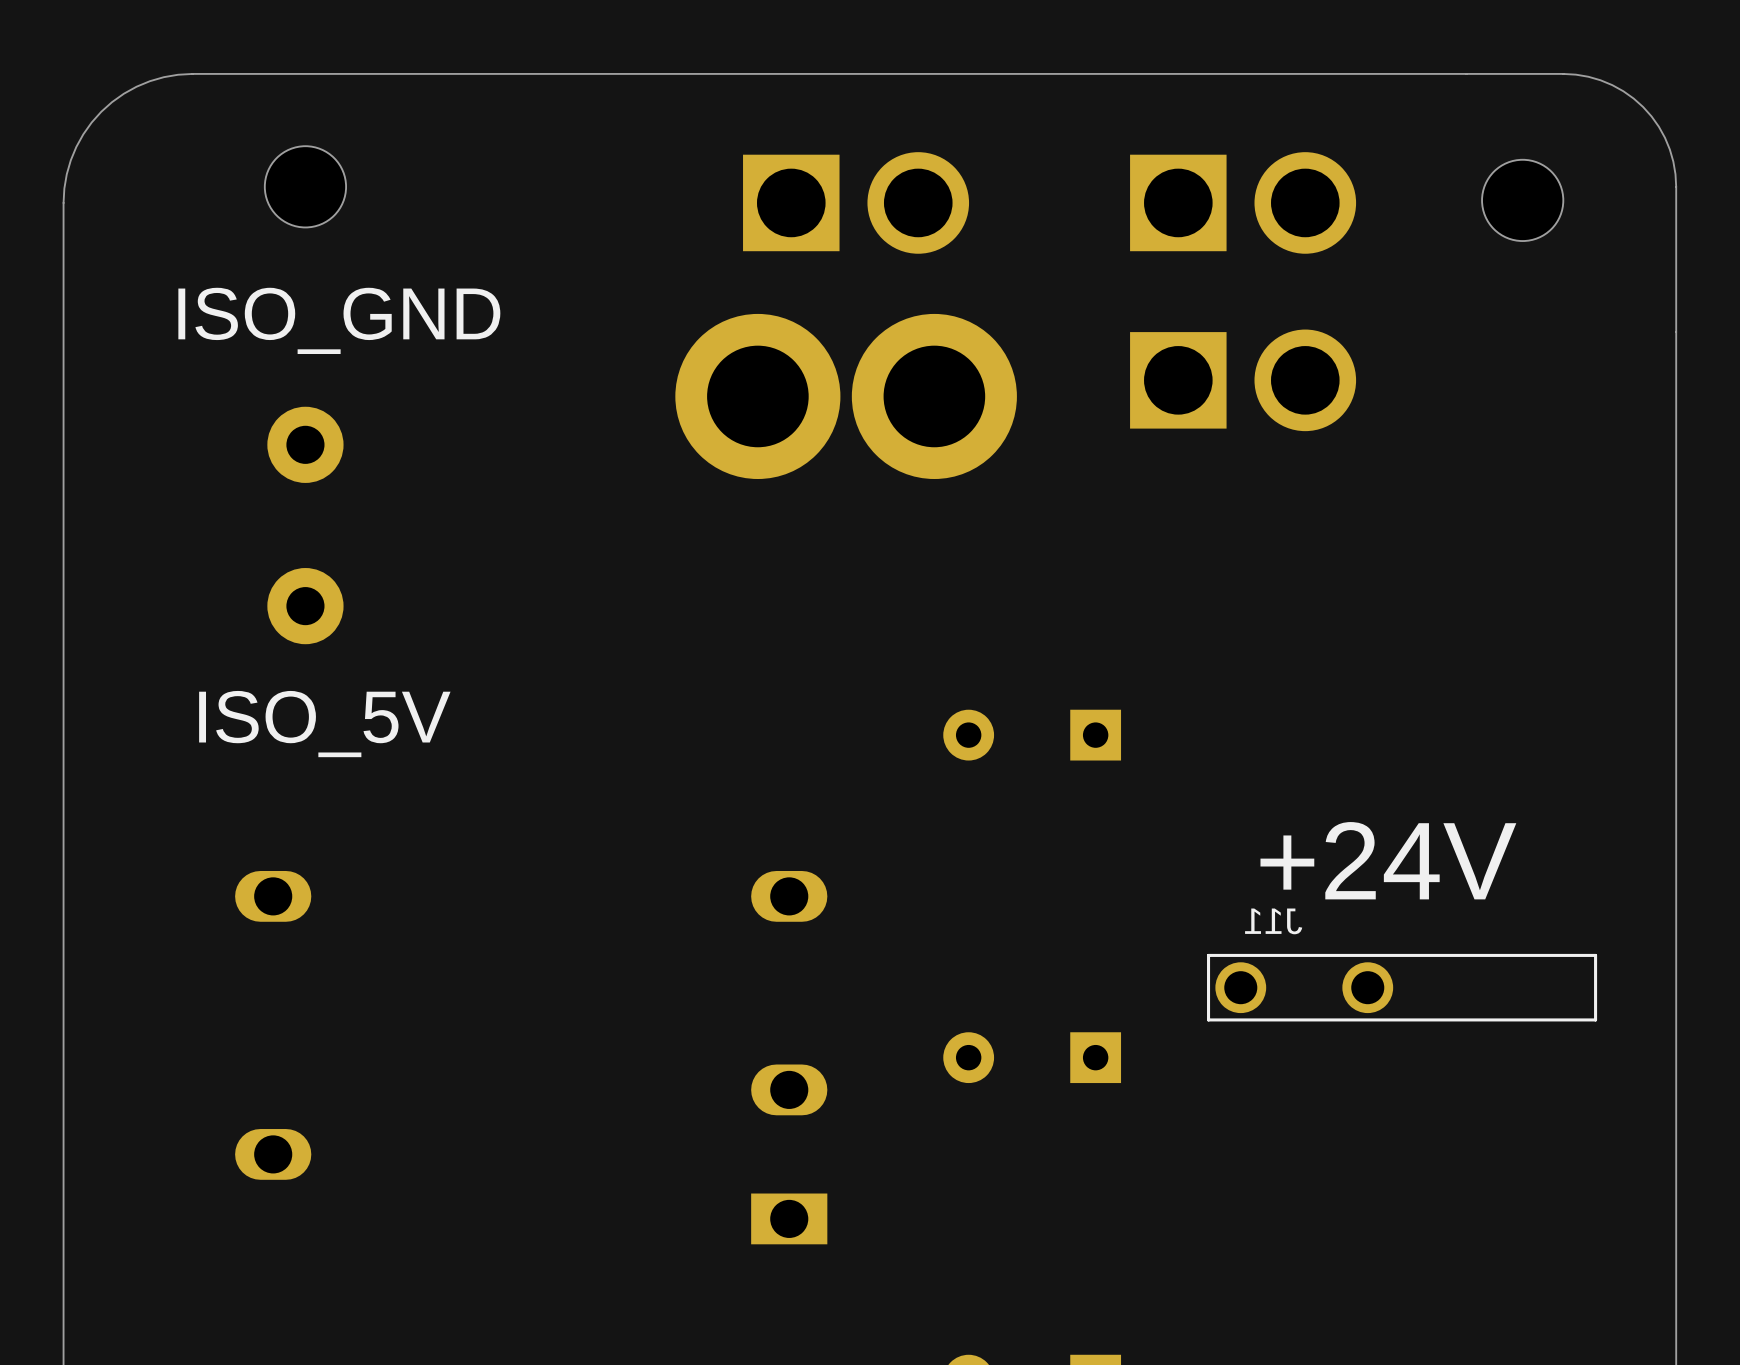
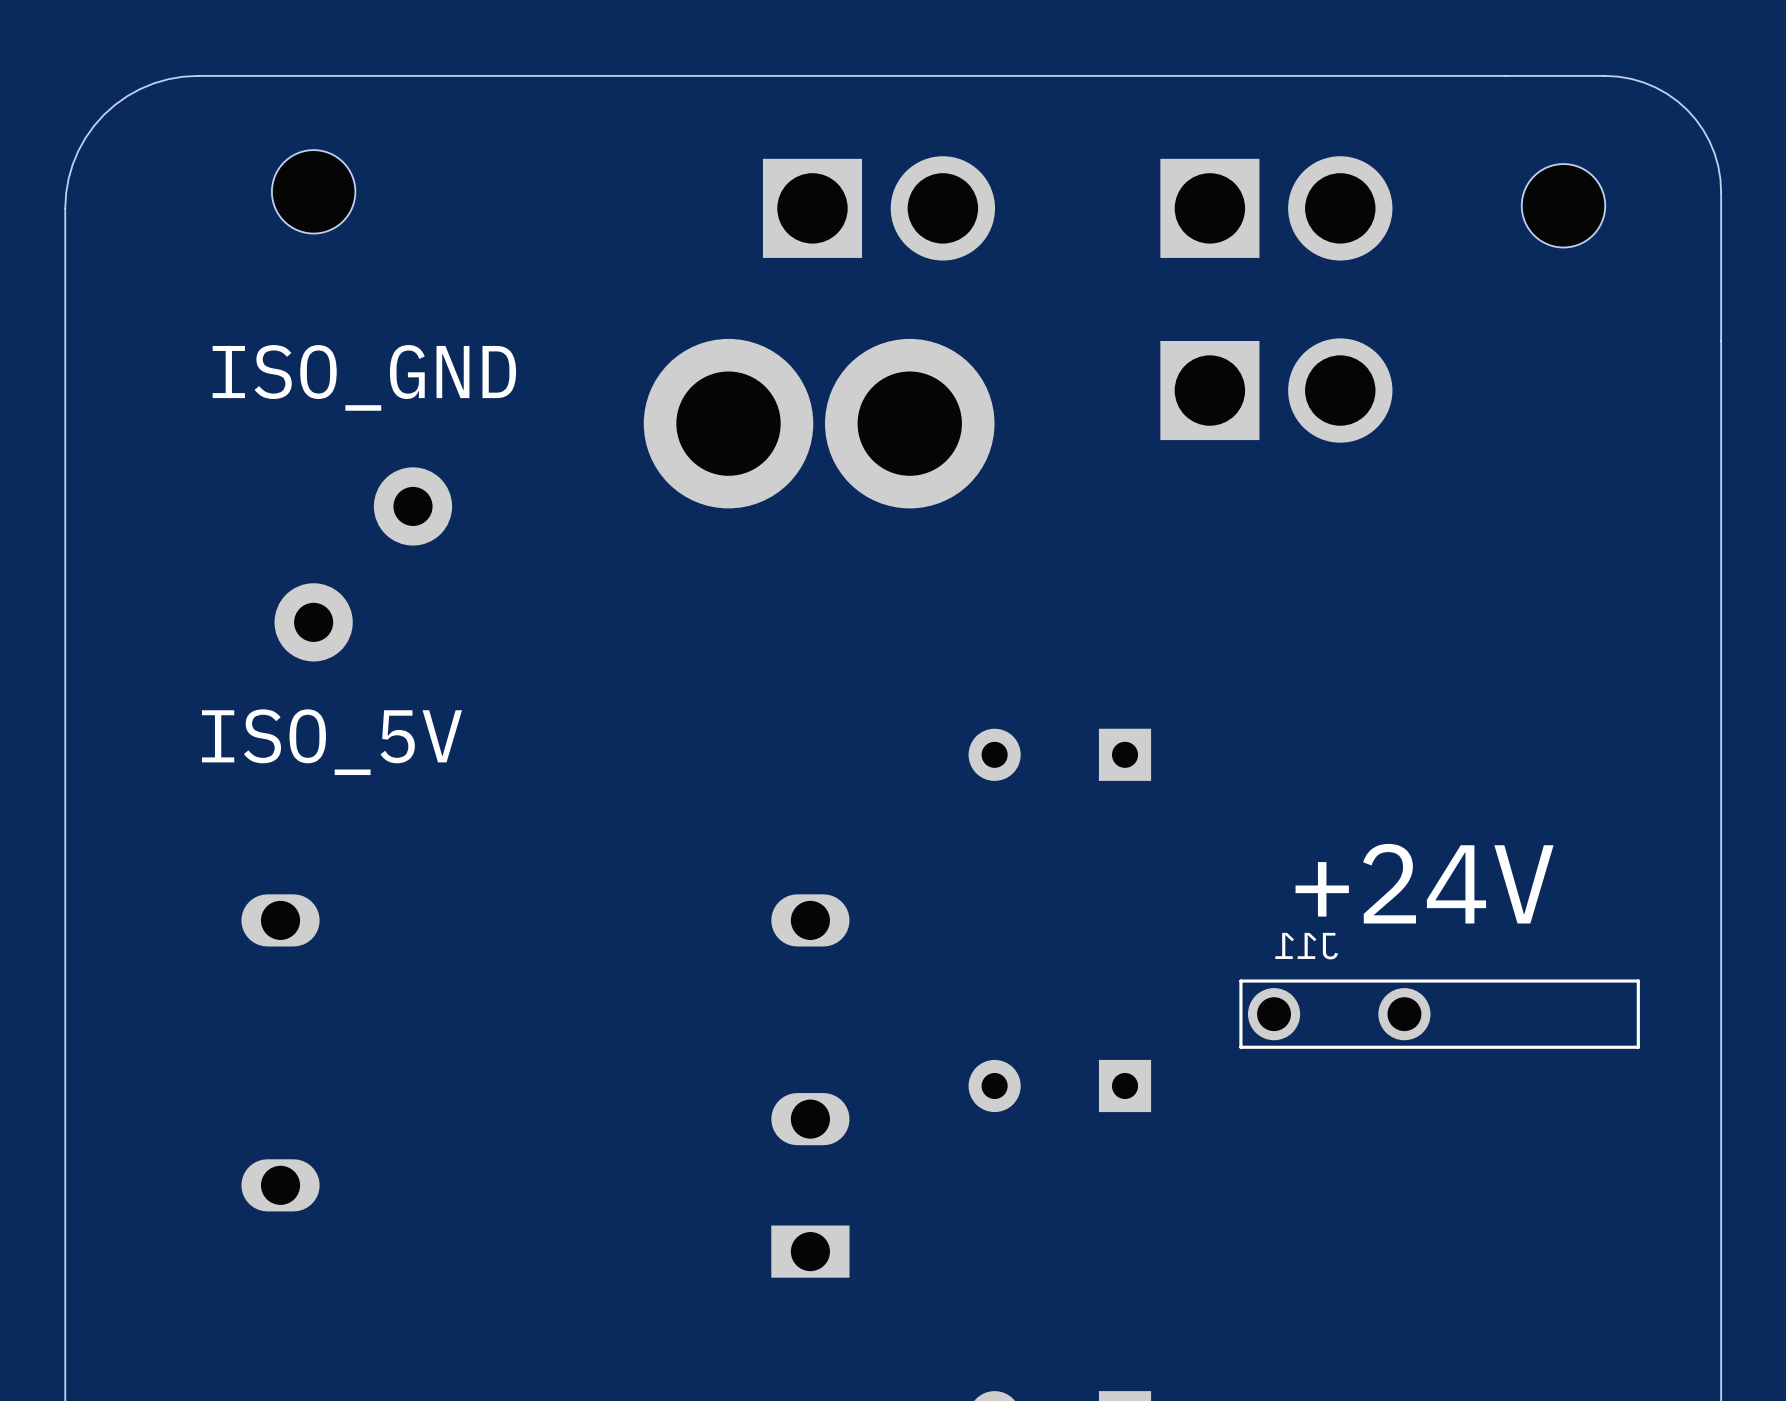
text position: ISO_GND (339, 320) -> ISO_GND (364, 377)
part position: (846, 396) -> (819, 423)
part position: (305, 444) -> (412, 506)

